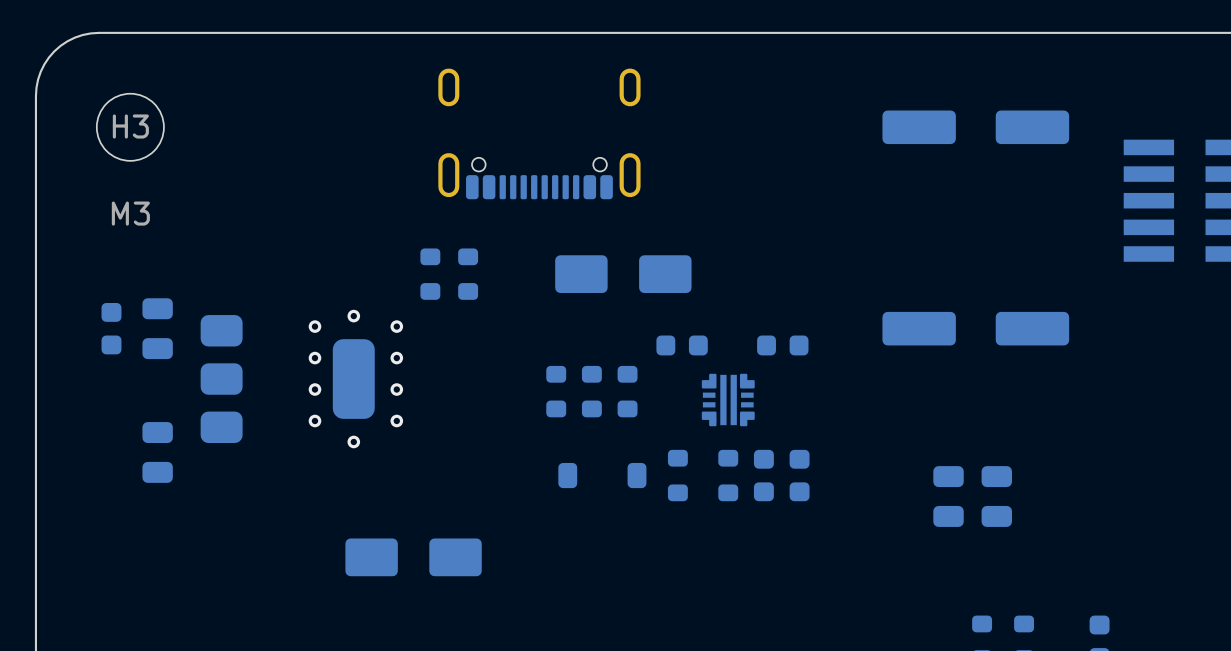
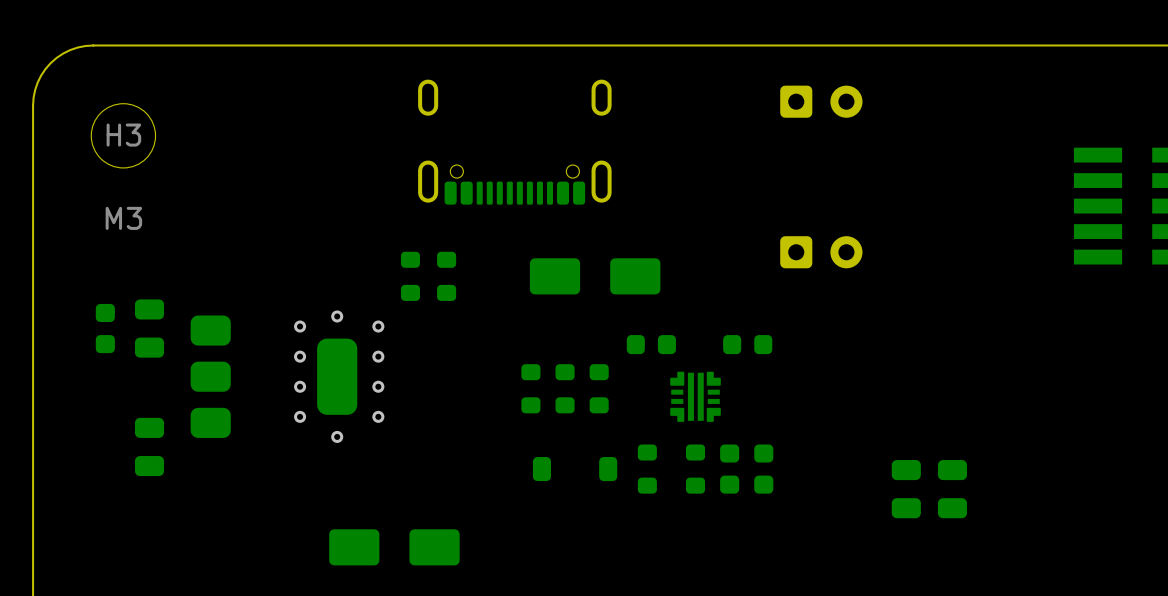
part: none -> (821, 101)
part: (975, 127) -> none
part: none -> (821, 252)
part: (975, 328) -> none

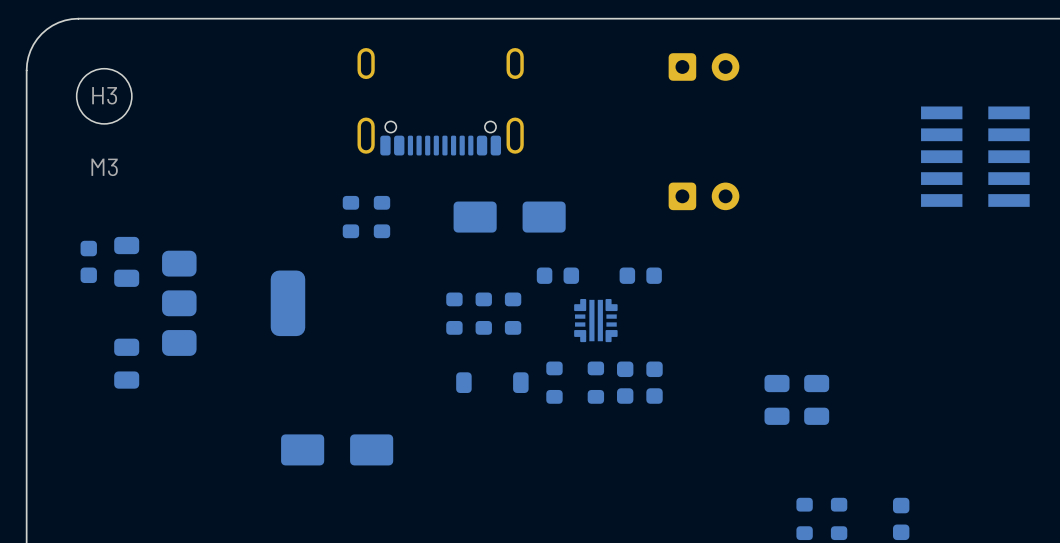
via: (337, 316) -> none
via: (300, 326) -> none
via: (378, 326) -> none
via: (300, 356) -> none
via: (378, 356) -> none
via: (300, 386) -> none
via: (378, 386) -> none
via: (300, 416) -> none
via: (378, 416) -> none
via: (337, 436) -> none

